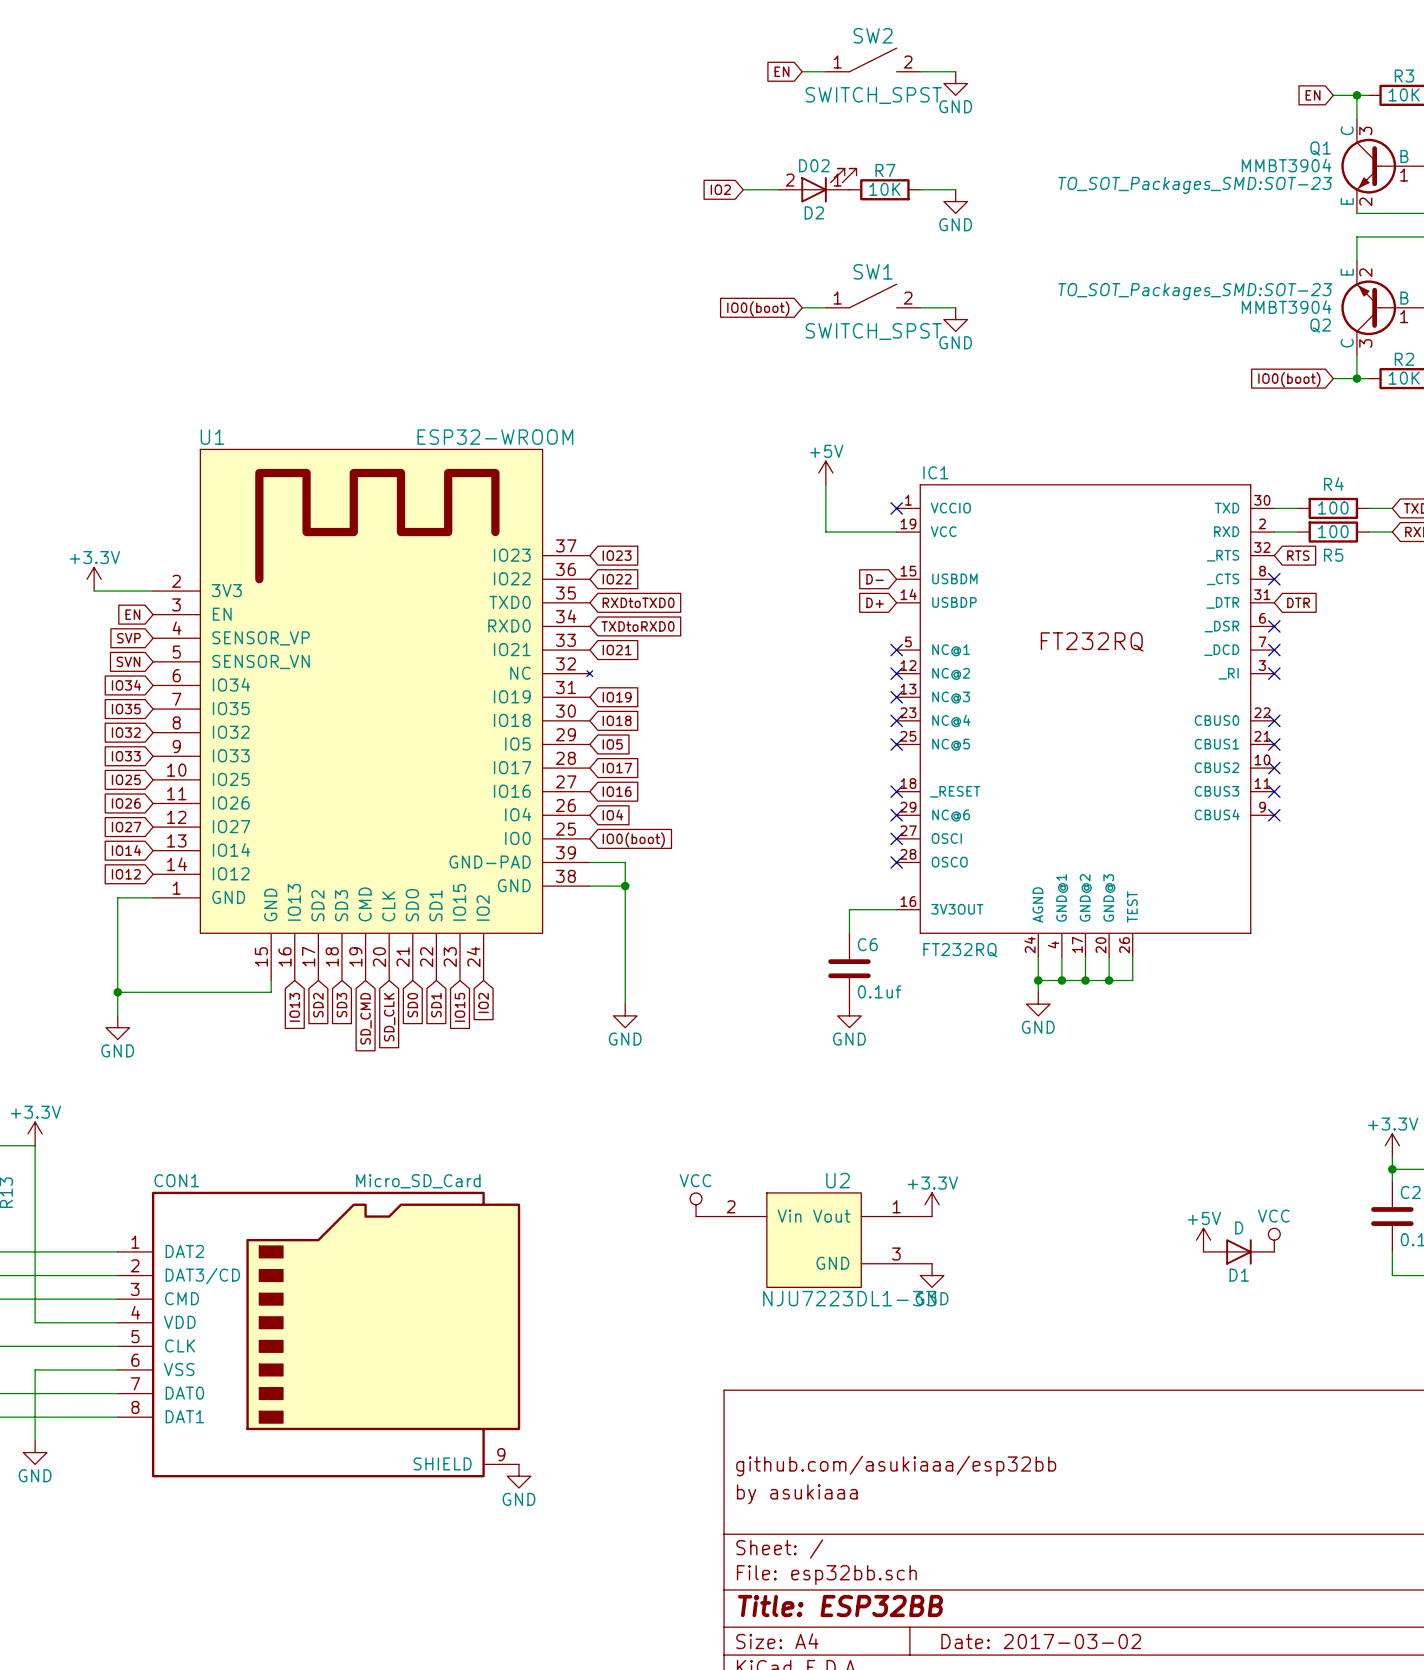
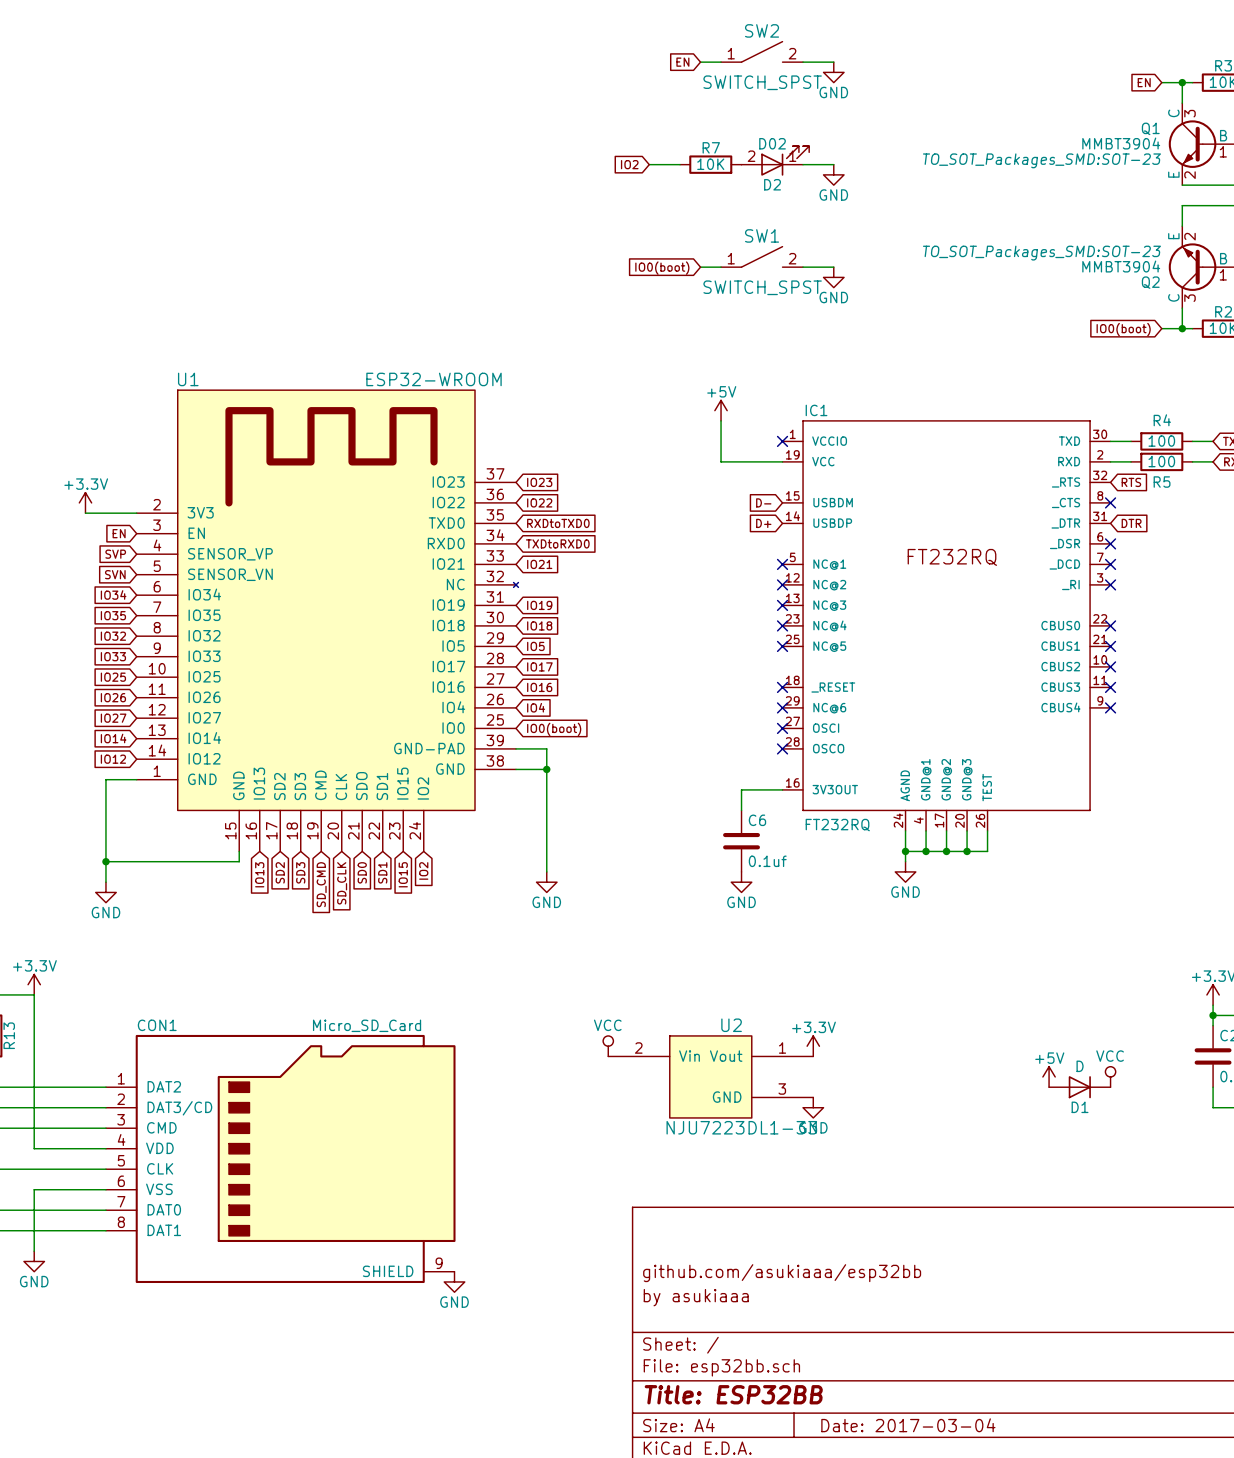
D2 position: (817, 185) -> (775, 160)
R7 position: (884, 189) -> (710, 164)
title block: Date: 2017-03-02 (1041, 1641) -> Date: 2017-03-04 (908, 1425)

